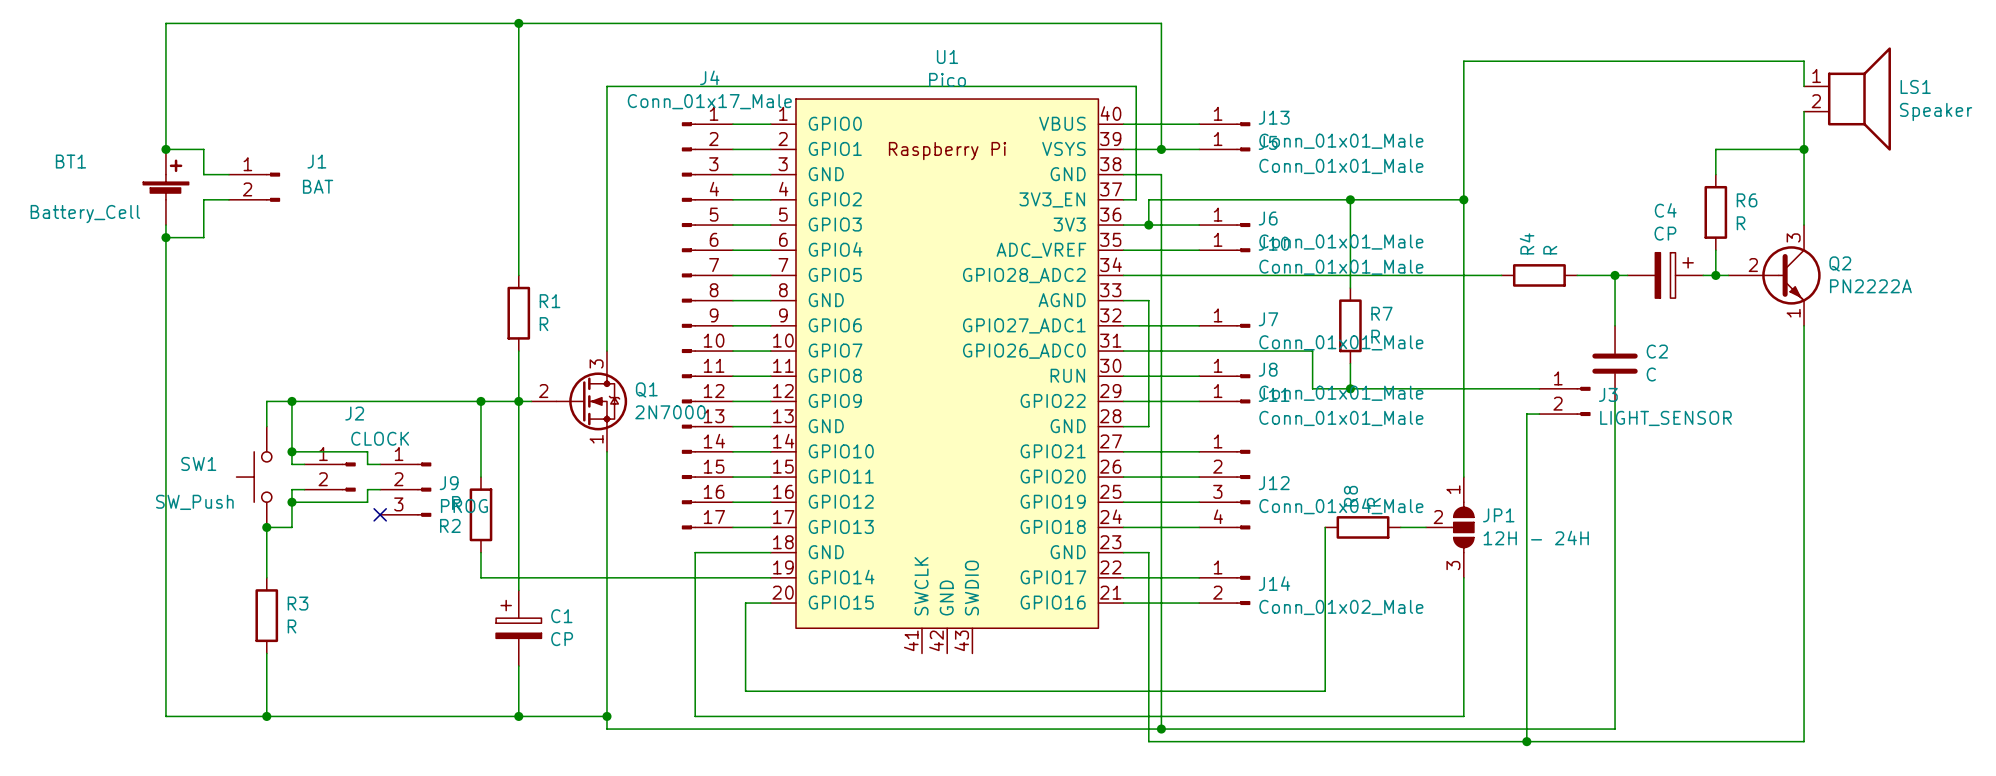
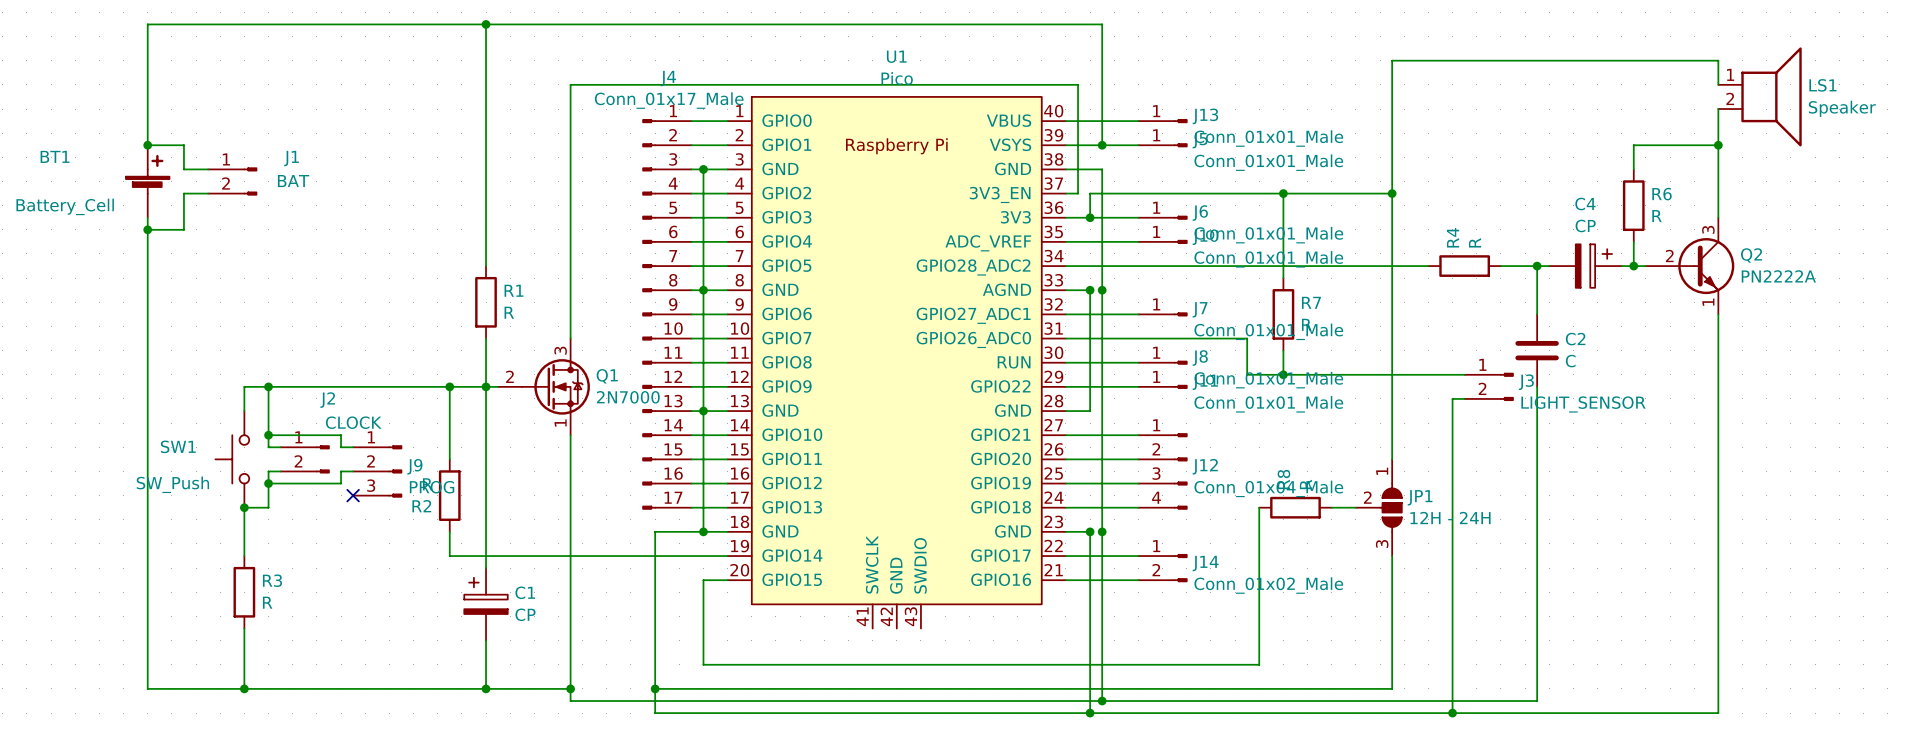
wire: none -> (703, 169) (703, 531)
junction: none -> (703, 169)
junction: none -> (703, 290)
junction: none -> (1090, 290)
junction: none -> (1102, 290)
junction: none -> (703, 411)
junction: none -> (703, 531)
junction: none -> (1090, 531)
junction: none -> (1102, 531)
wire: none -> (655, 688) (655, 713) (1090, 713)
junction: none -> (655, 688)
junction: none -> (1090, 713)

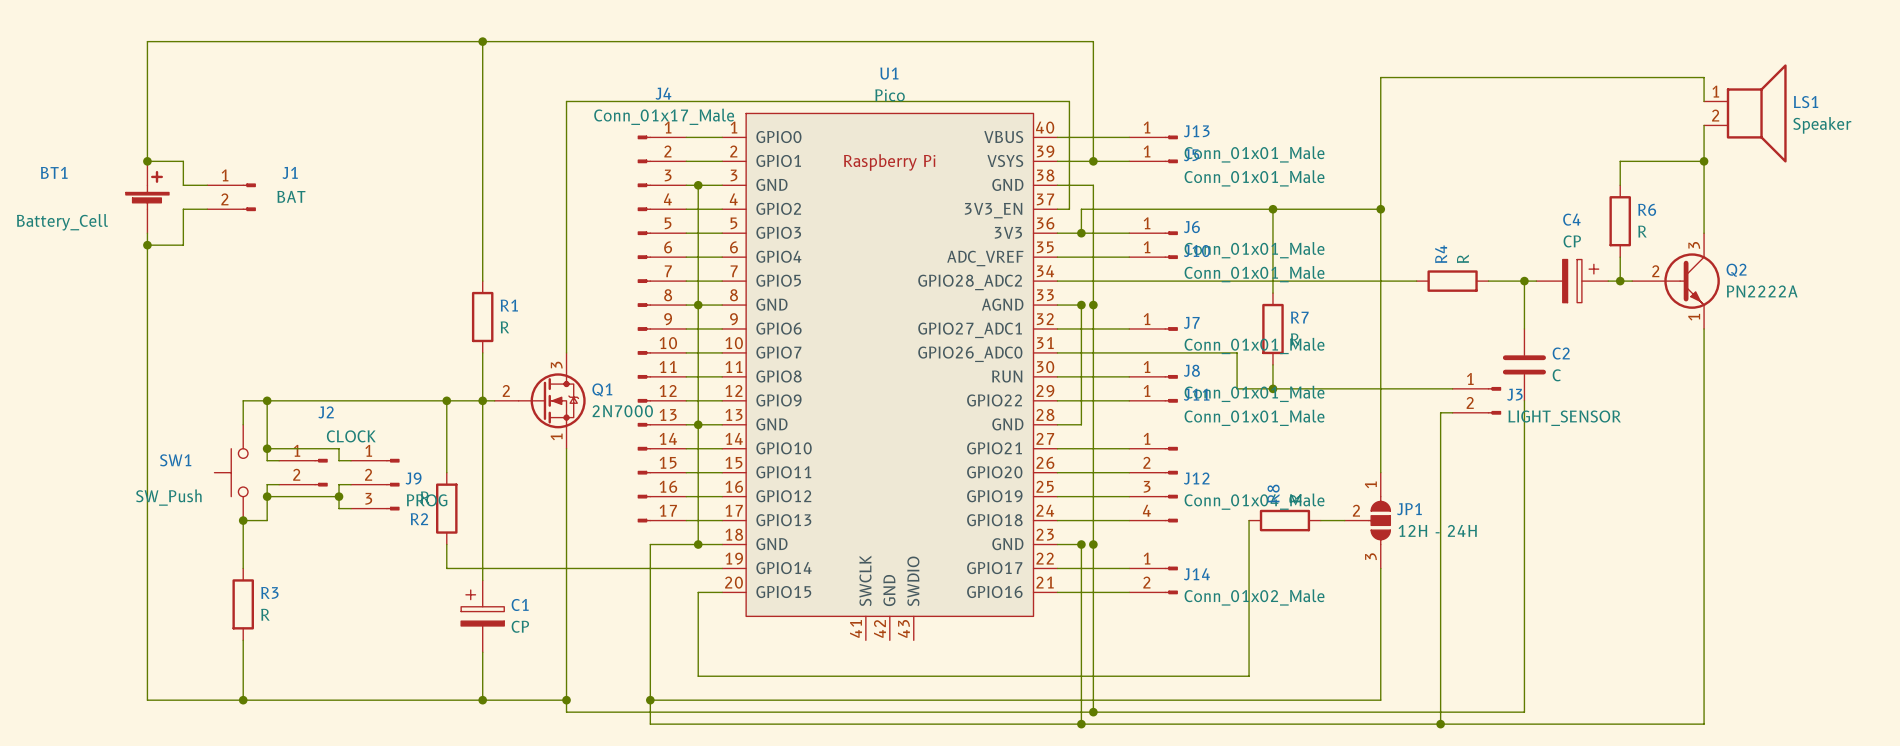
wire: none -> (339, 496) (339, 508) (350, 508)
junction: none -> (339, 496)
no-connect mark: (353, 495) -> none

